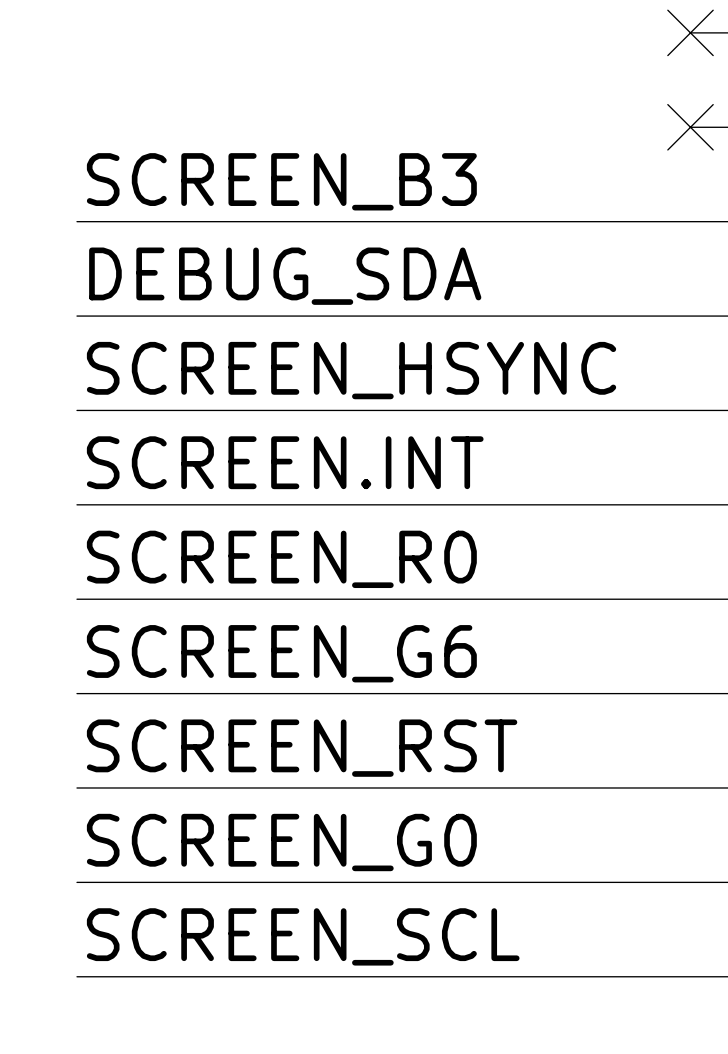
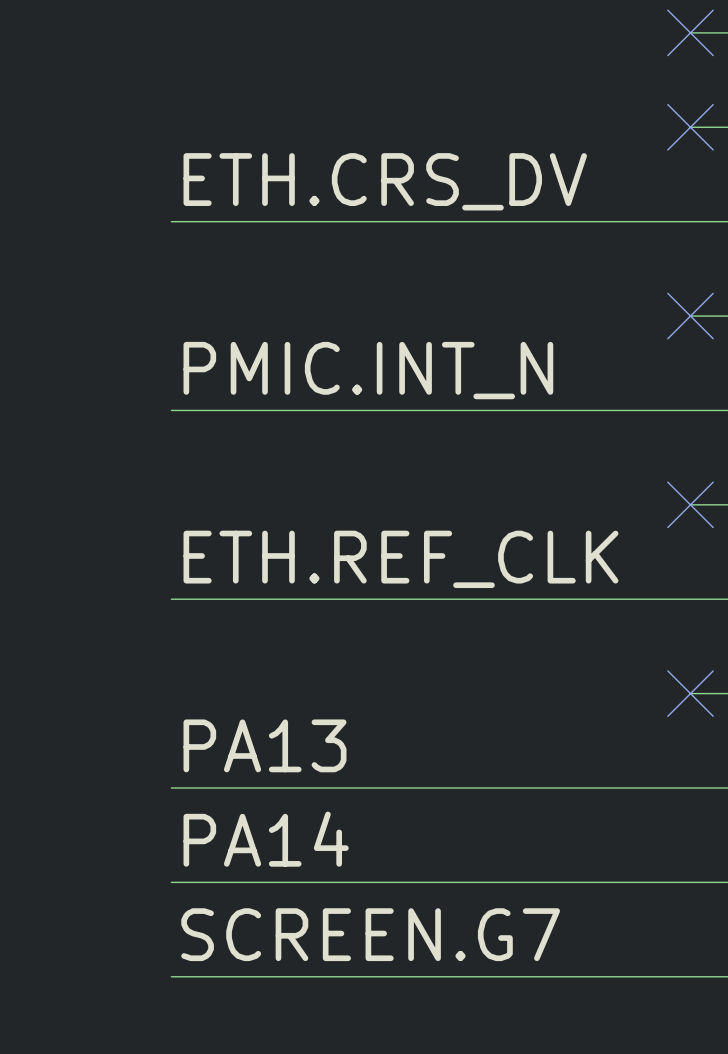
label: SCREEN_B3 (281, 181) -> none
label: none -> ETH.CRS_DV (385, 181)
wire: (76, 221) (171, 221) -> none
label: DEBUG_SDA (285, 276) -> none
wire: (76, 316) (690, 316) -> none
no-connect mark: none -> (690, 316)
label: SCREEN_HSYNC (351, 370) -> none
label: none -> PMIC.INT_N (368, 370)
wire: (76, 410) (171, 410) -> none
label: SCREEN.INT (285, 462) -> none
wire: (76, 504) (690, 504) -> none
no-connect mark: none -> (690, 504)
label: SCREEN_R0 (281, 559) -> none
label: none -> ETH.REF_CLK (400, 559)
wire: (76, 599) (171, 599) -> none
label: SCREEN_G6 (281, 653) -> none
wire: (76, 693) (690, 693) -> none
no-connect mark: none -> (690, 693)
label: none -> PA13 (265, 745)
label: SCREEN_RST (302, 748) -> none
wire: (76, 787) (171, 787) -> none
label: none -> PA14 (266, 839)
label: SCREEN_G0 (281, 842) -> none
wire: (76, 882) (171, 882) -> none
label: none -> SCREEN.G7 (370, 934)
label: SCREEN_SCL (303, 936) -> none
wire: (76, 976) (171, 976) -> none

